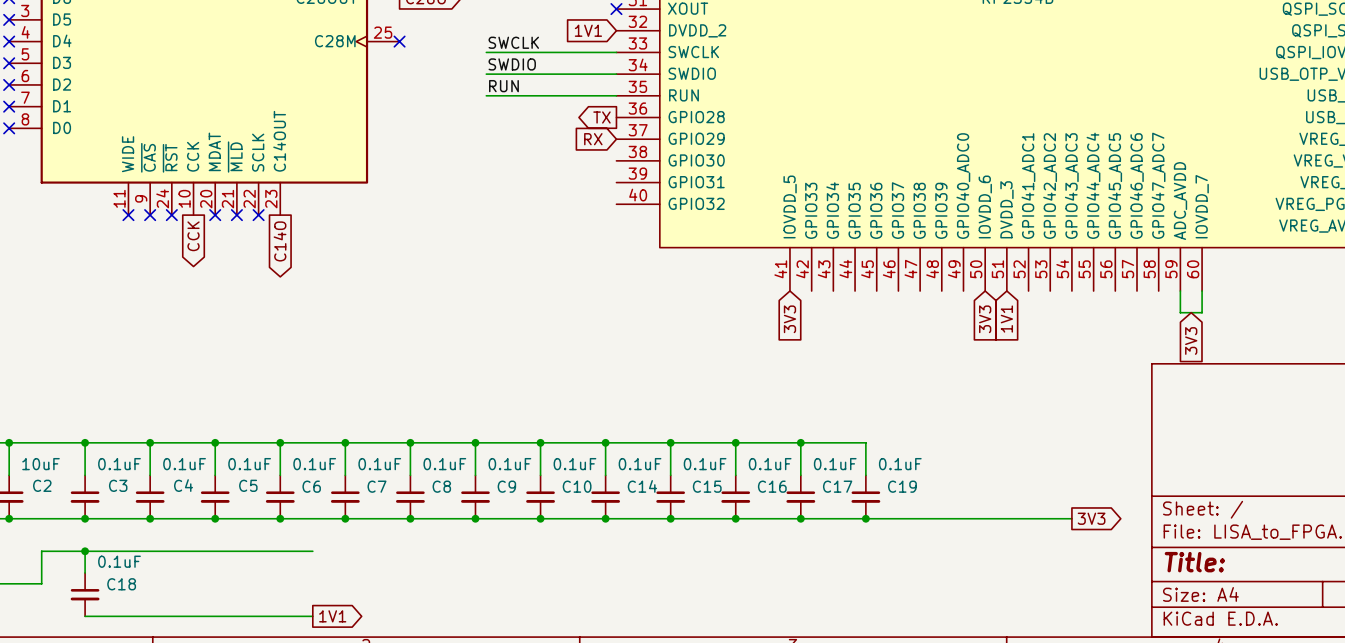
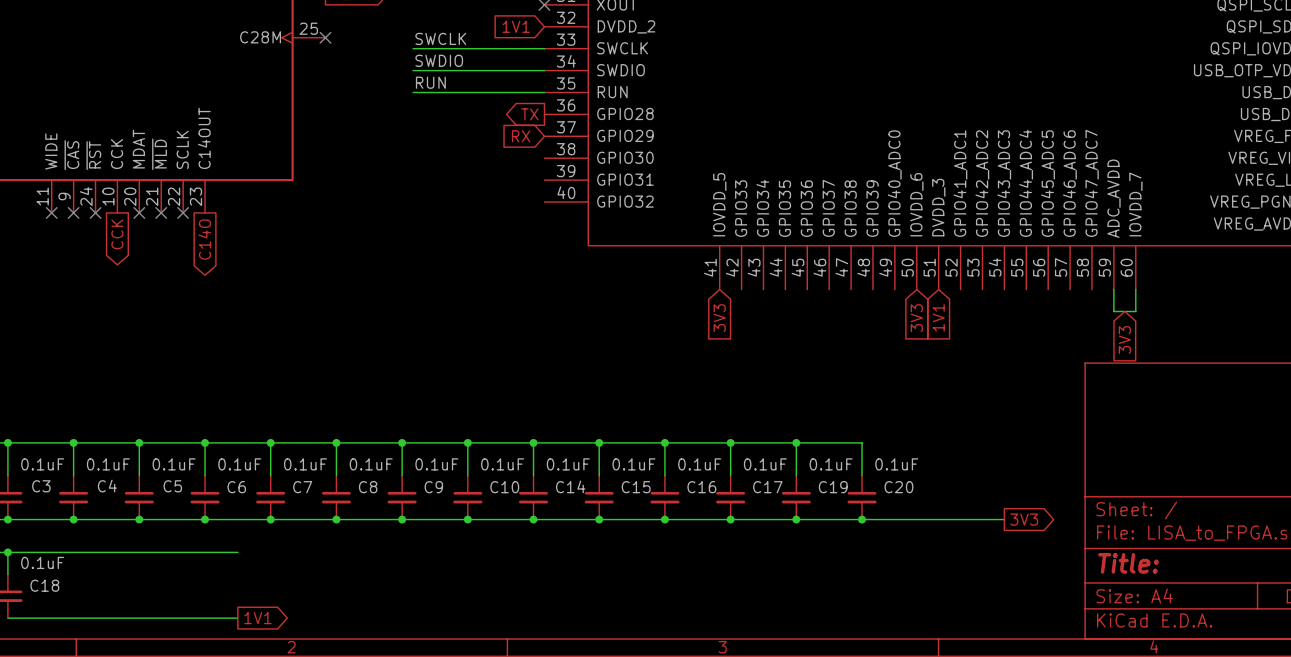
wire: none -> (796, 442) (862, 442) (862, 475)
junction: none -> (796, 442)
C20: none -> 0.1uF (862, 497)
junction: none -> (862, 519)

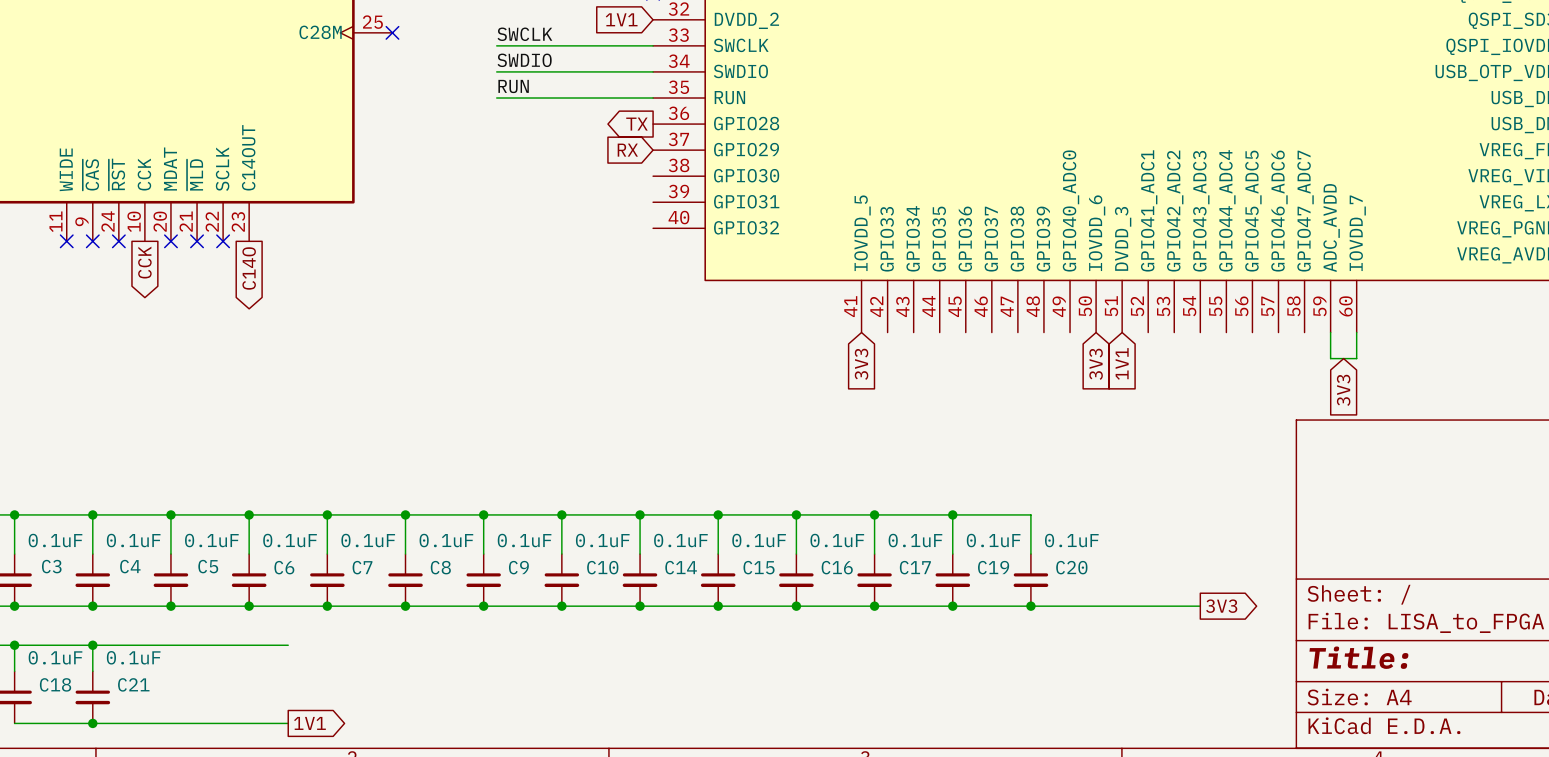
wire: none -> (92, 645) (92, 671)
junction: none -> (92, 645)
C21: none -> 0.1uF (92, 697)
junction: none -> (92, 723)

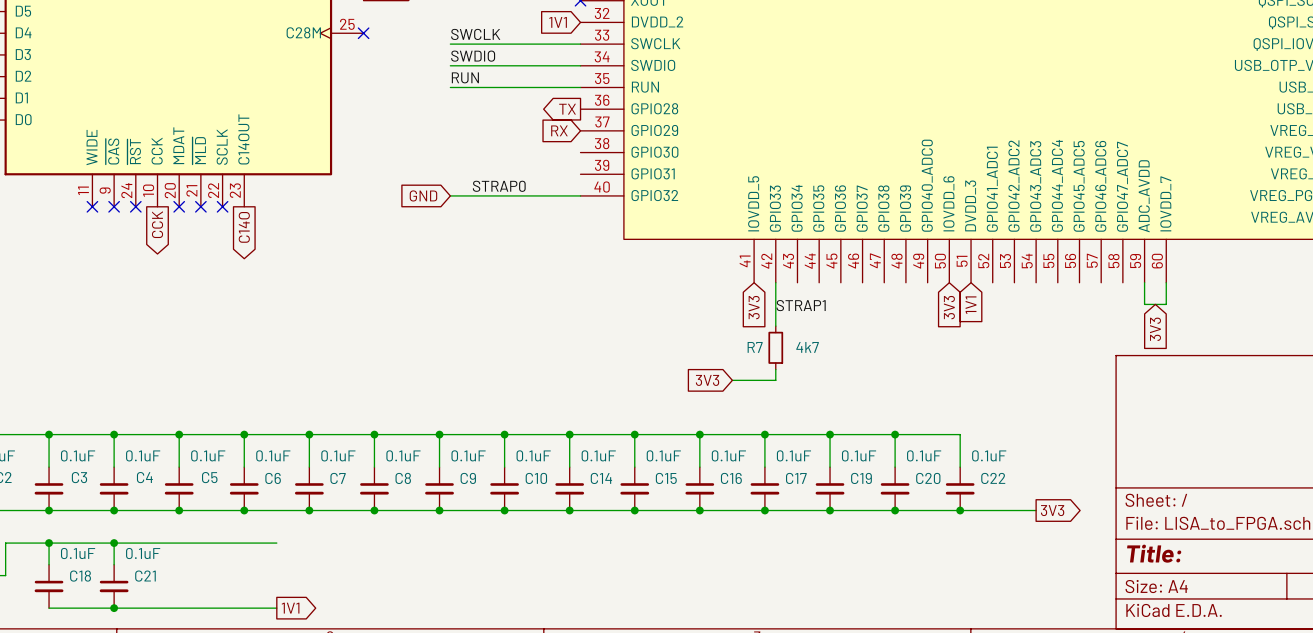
label: none -> STRAP0 (499, 186)
global label: none -> GND (423, 195)
wire: none -> (450, 195) (580, 195)
wire: none -> (775, 282) (775, 326)
label: none -> STRAP1 (801, 305)
R7: none -> 4k7 (775, 347)
wire: none -> (775, 369) (775, 380) (732, 380)
global label: none -> 3V3 (707, 380)
wire: none -> (895, 434) (960, 434) (960, 467)
junction: none -> (895, 434)
C22: none -> 0.1uF (960, 488)
junction: none -> (960, 510)

